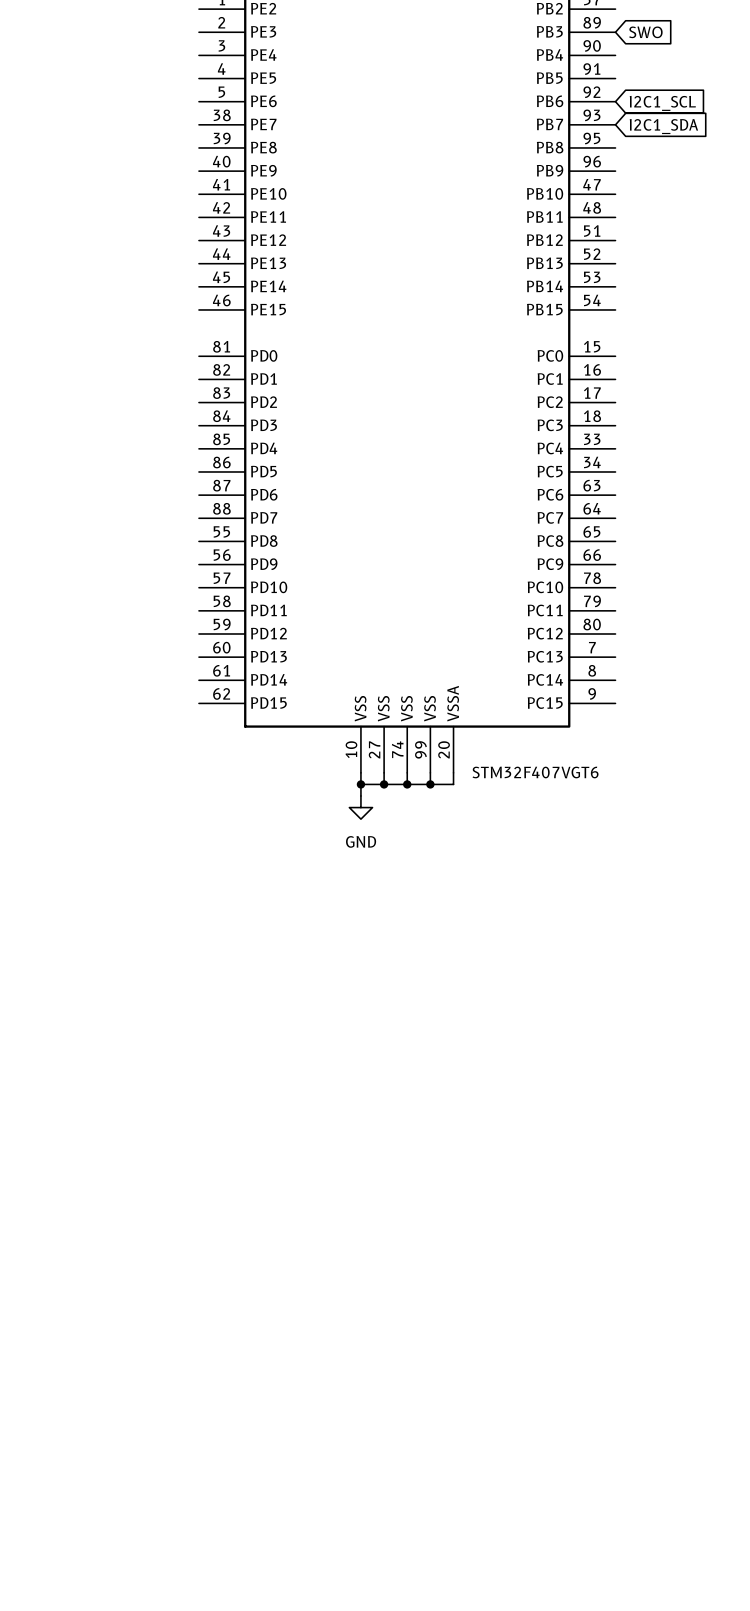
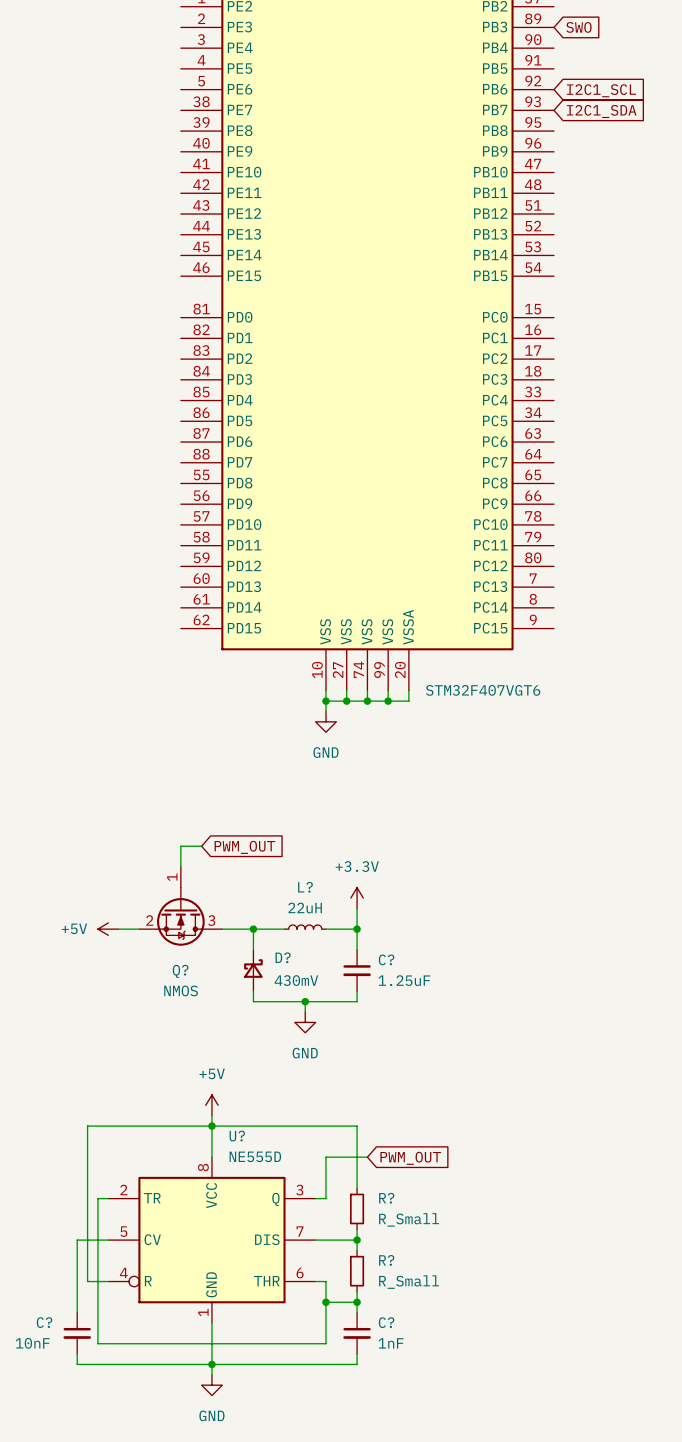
wire: none -> (201, 846) (180, 846) (180, 866)
global label: none -> PWM_OUT (244, 847)
power symbol: none -> +3.3V (357, 898)
Q?: none -> NMOS (180, 906)
wire: none -> (357, 908) (357, 949)
L?: none -> 22uH (305, 927)
power symbol: none -> +5V (108, 929)
wire: none -> (118, 929) (139, 929)
wire: none -> (222, 929) (284, 929)
wire: none -> (253, 929) (253, 949)
junction: none -> (253, 929)
wire: none -> (325, 929) (357, 929)
junction: none -> (357, 929)
D?: none -> 430mV (253, 970)
C?: none -> 1.25uF (357, 970)
wire: none -> (253, 991) (253, 1001) (357, 1001) (357, 991)
wire: none -> (305, 1001) (305, 1012)
junction: none -> (305, 1001)
power symbol: none -> GND (305, 1022)
power symbol: none -> +5V (211, 1105)
wire: none -> (211, 1115) (211, 1157)
junction: none -> (211, 1126)
wire: none -> (367, 1157) (325, 1157) (325, 1198) (315, 1198)
global label: none -> PWM_OUT (410, 1158)
wire: none -> (357, 1188) (357, 1126) (87, 1126) (87, 1281) (108, 1281)
wire: none -> (108, 1198) (97, 1198) (97, 1343) (325, 1343) (325, 1281) (315, 1281)
R?: none -> R_Small (357, 1208)
wire: none -> (357, 1229) (357, 1250)
wire: none -> (108, 1240) (77, 1240) (77, 1312)
U?: none -> NE555D (211, 1240)
wire: none -> (315, 1240) (357, 1240)
junction: none -> (357, 1240)
R?: none -> R_Small (357, 1271)
wire: none -> (357, 1291) (357, 1312)
wire: none -> (325, 1302) (357, 1302)
junction: none -> (325, 1302)
junction: none -> (357, 1302)
wire: none -> (211, 1322) (211, 1374)
C?: none -> 10nF (77, 1333)
C?: none -> 1nF (357, 1333)
wire: none -> (77, 1354) (77, 1364) (357, 1364) (357, 1354)
junction: none -> (211, 1364)
power symbol: none -> GND (211, 1385)

